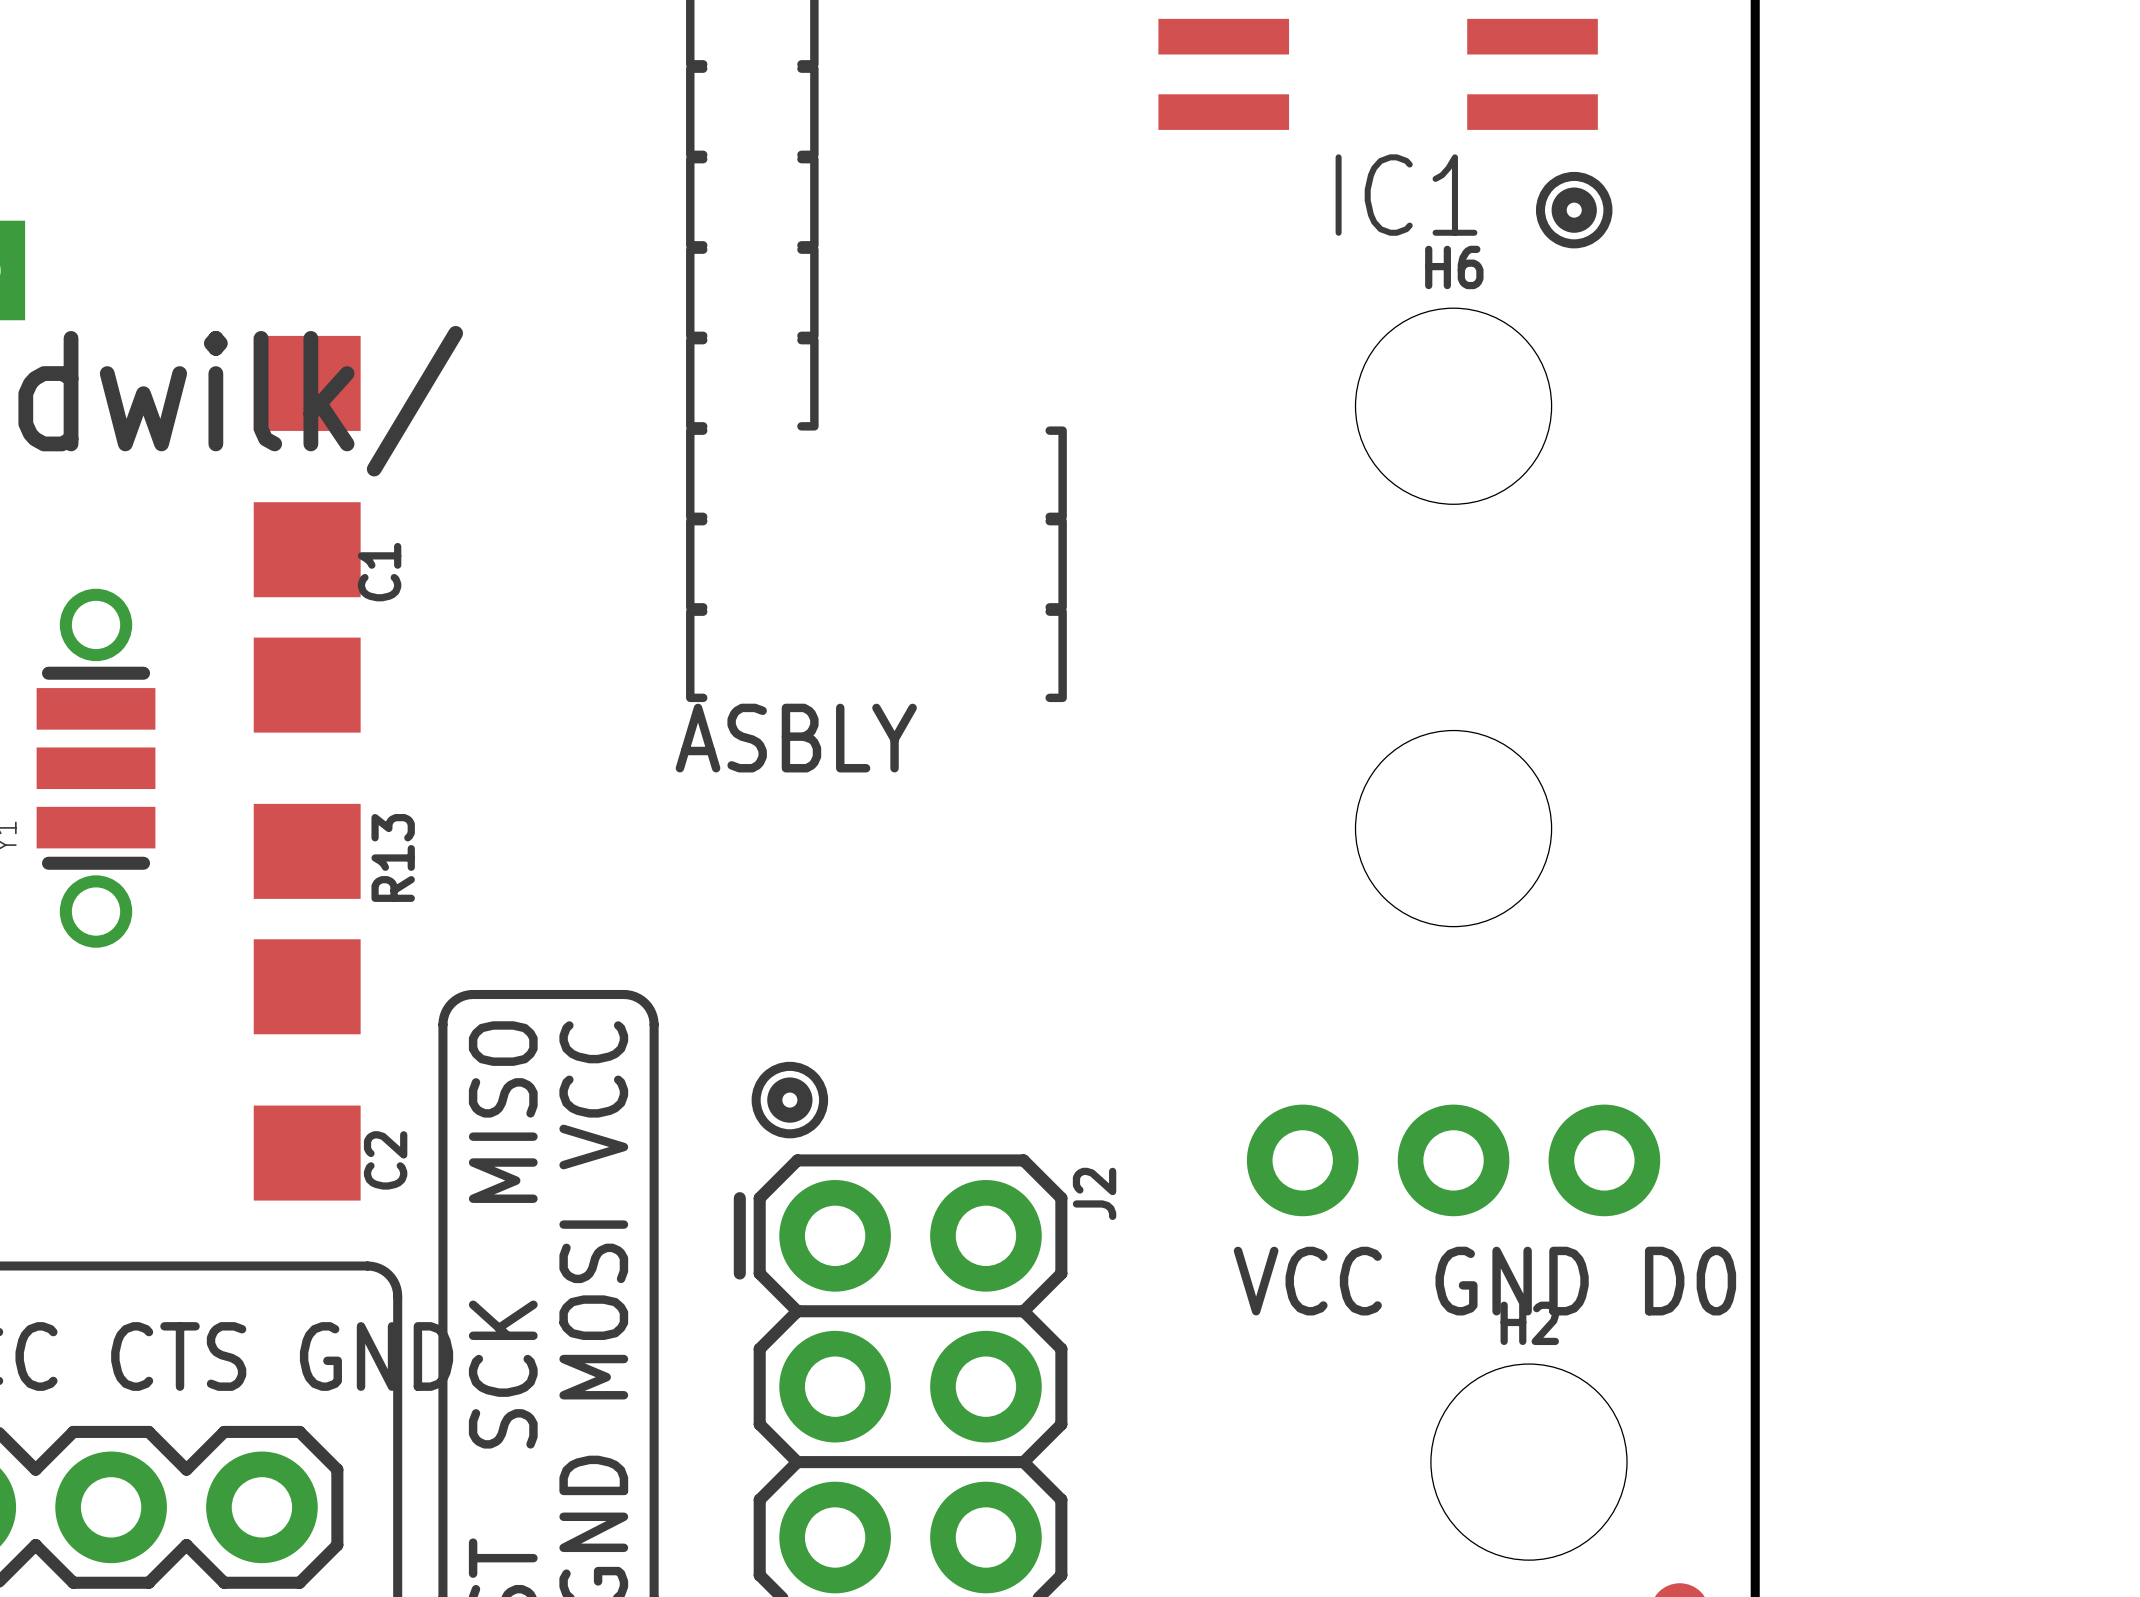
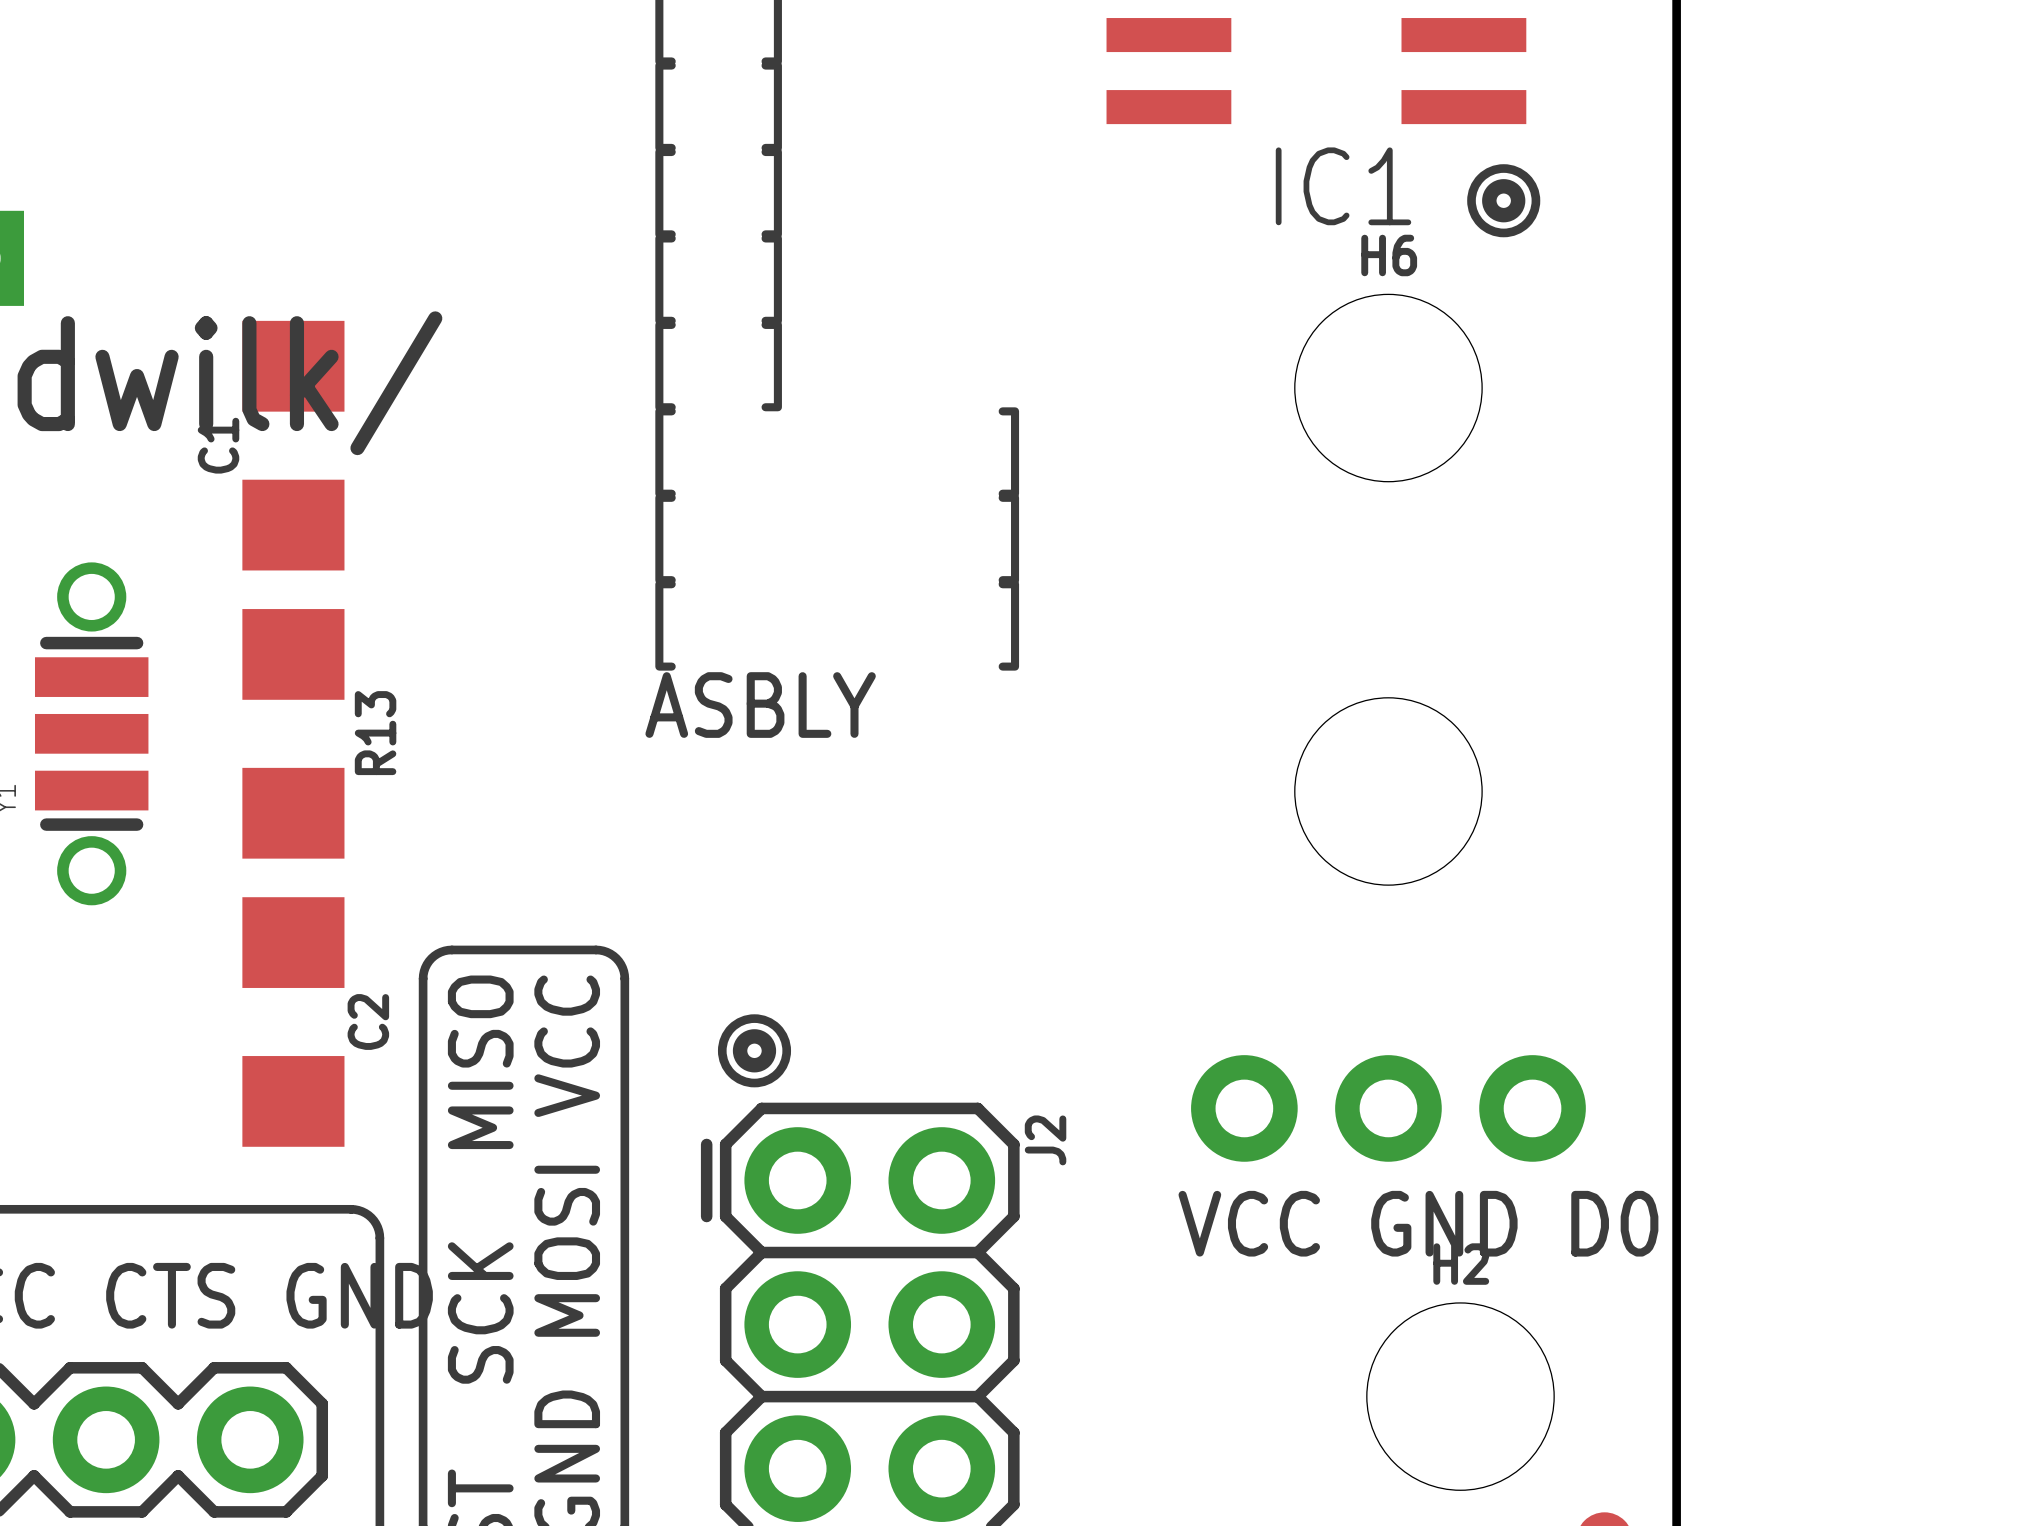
C1 name position: C1 (379, 572) -> C1 (218, 445)
R13 name position: R13 (393, 857) -> R13 (375, 733)
C2 name position: C2 (385, 1160) -> C2 (368, 1022)

